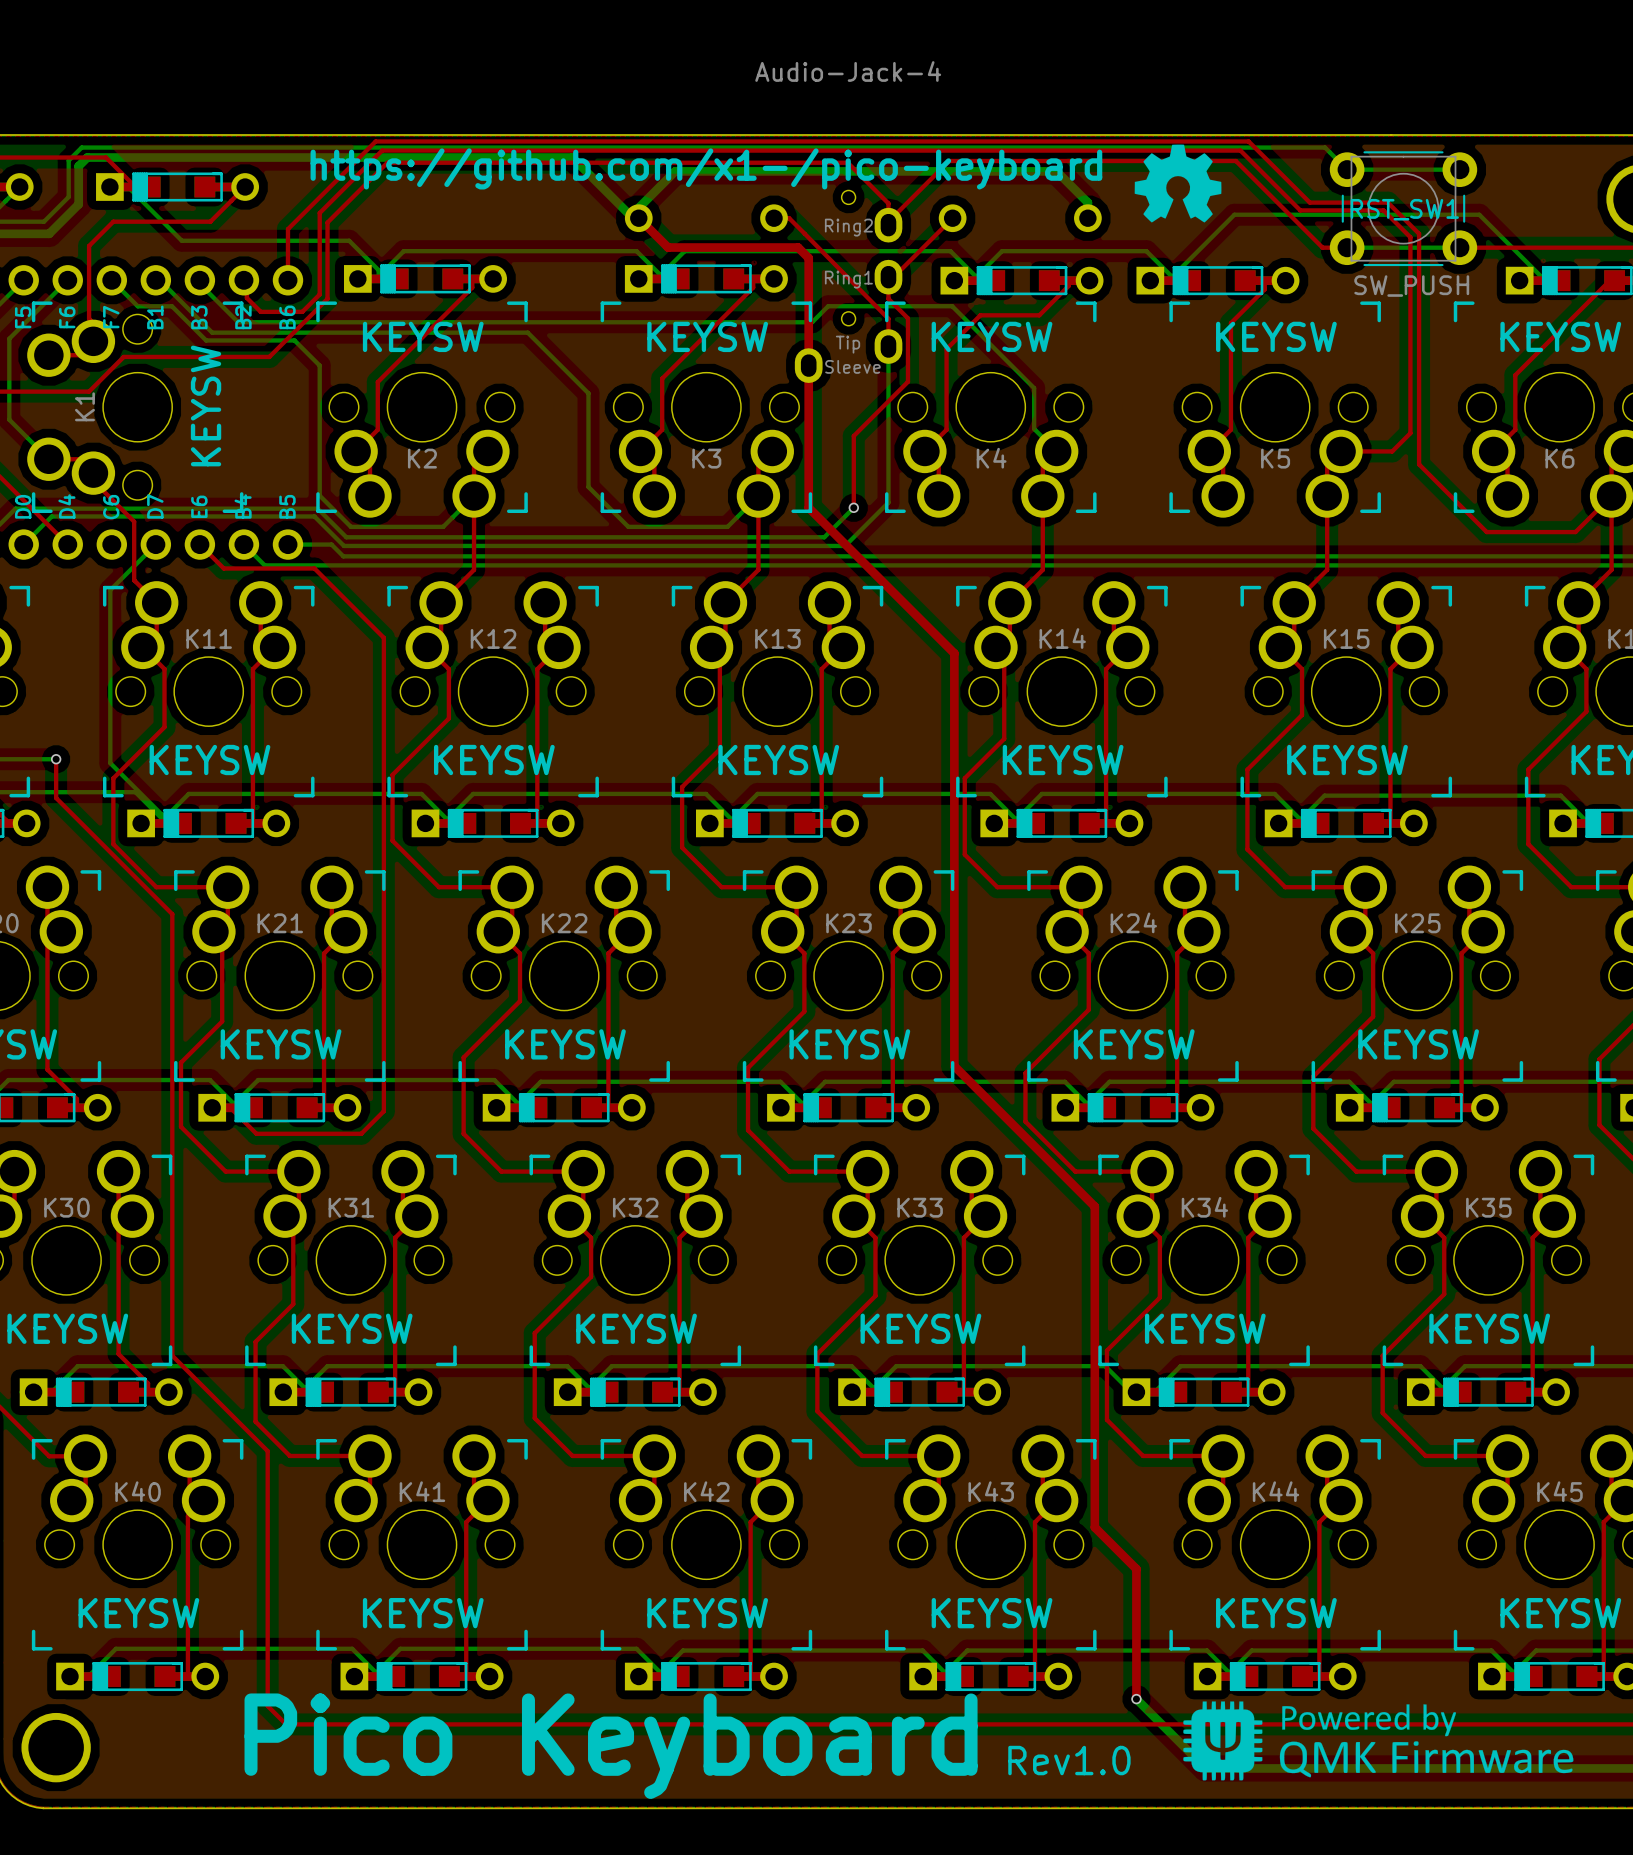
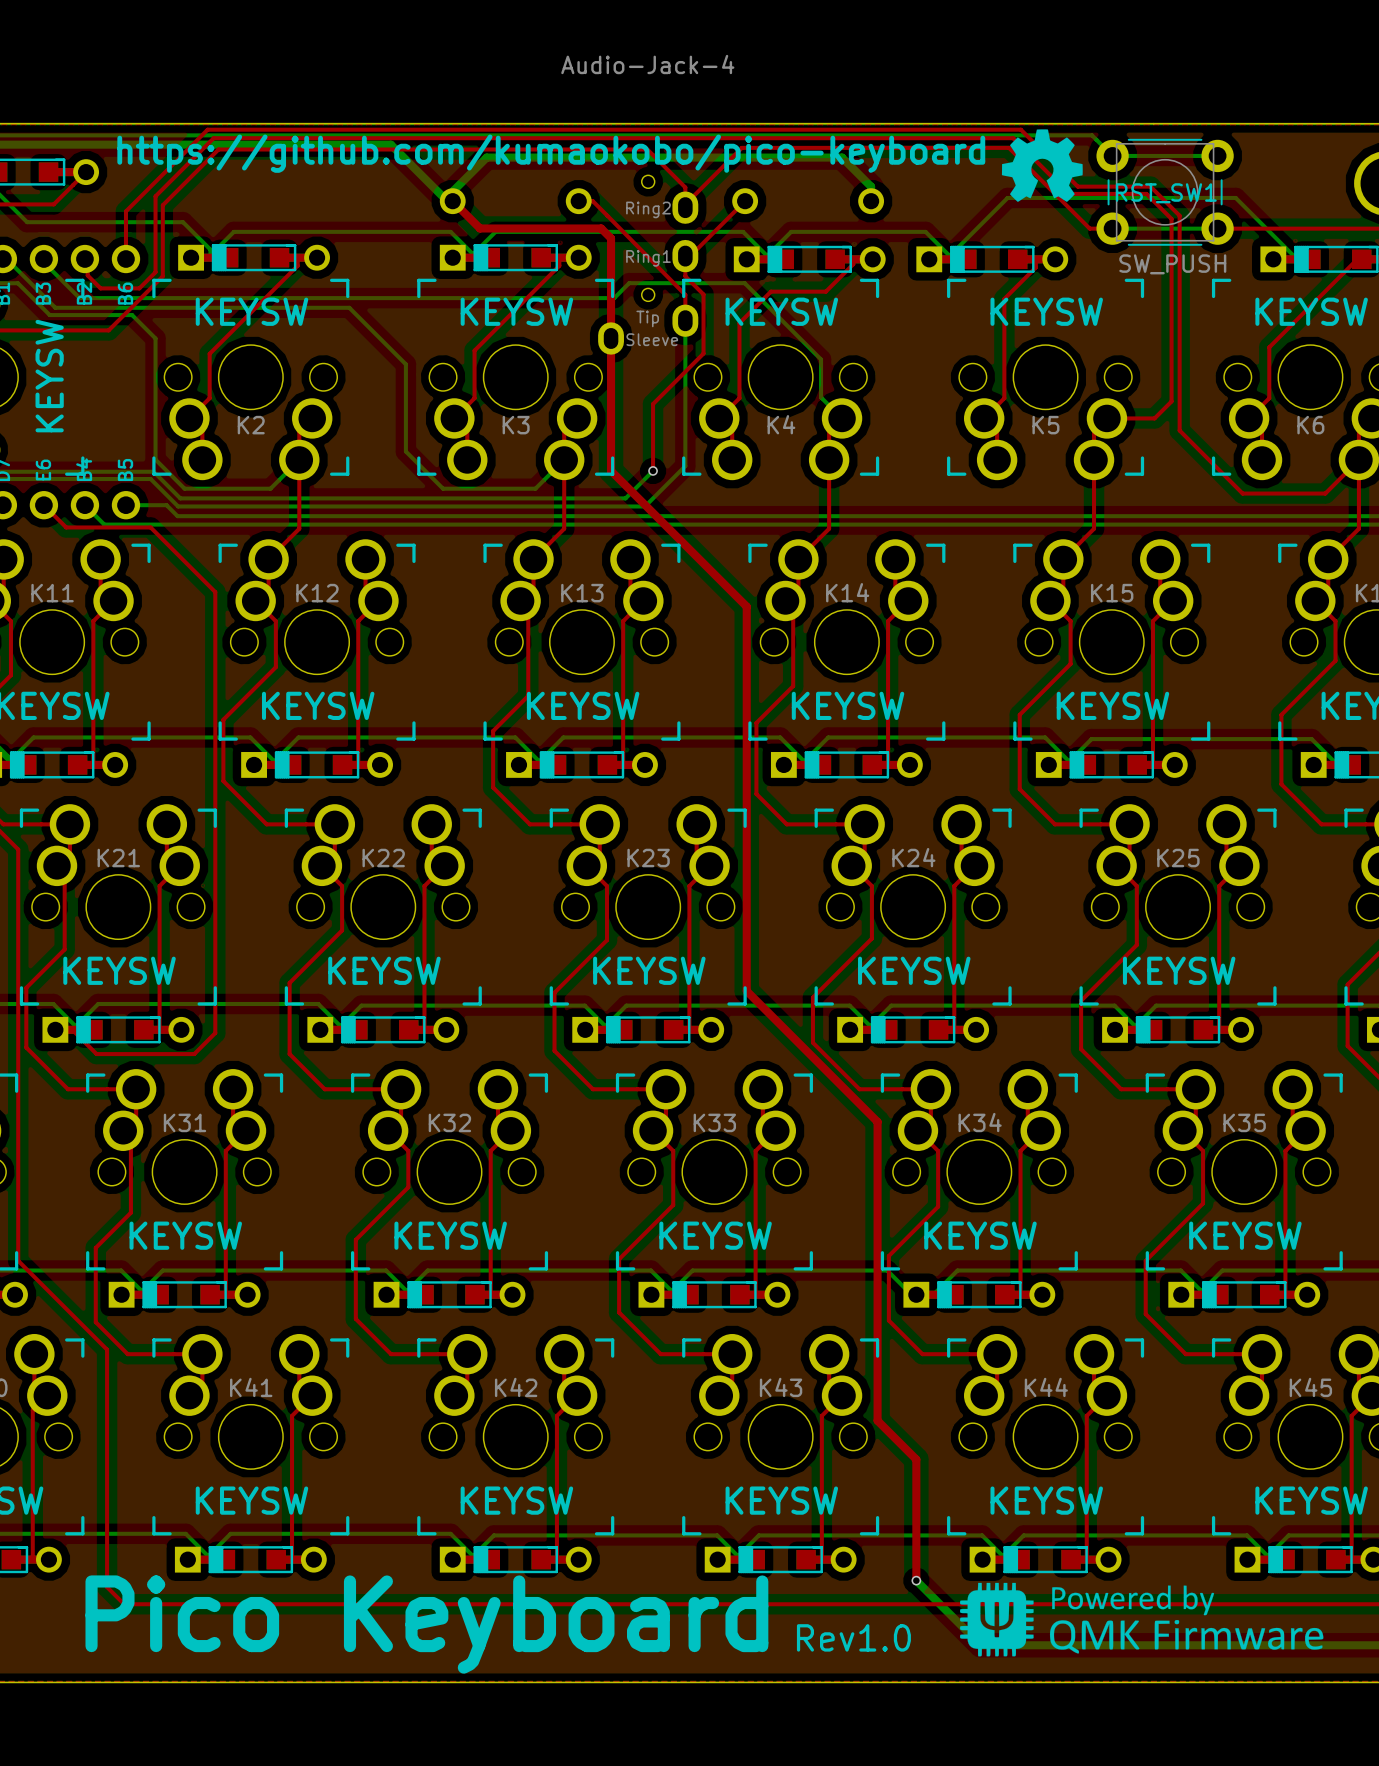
text: https://github.com/x1-/pico-keyboard (706, 168) -> https://github.com/kumaokobo/pico-keyboard (551, 153)
drawing position: (1178, 183) -> (1042, 165)

